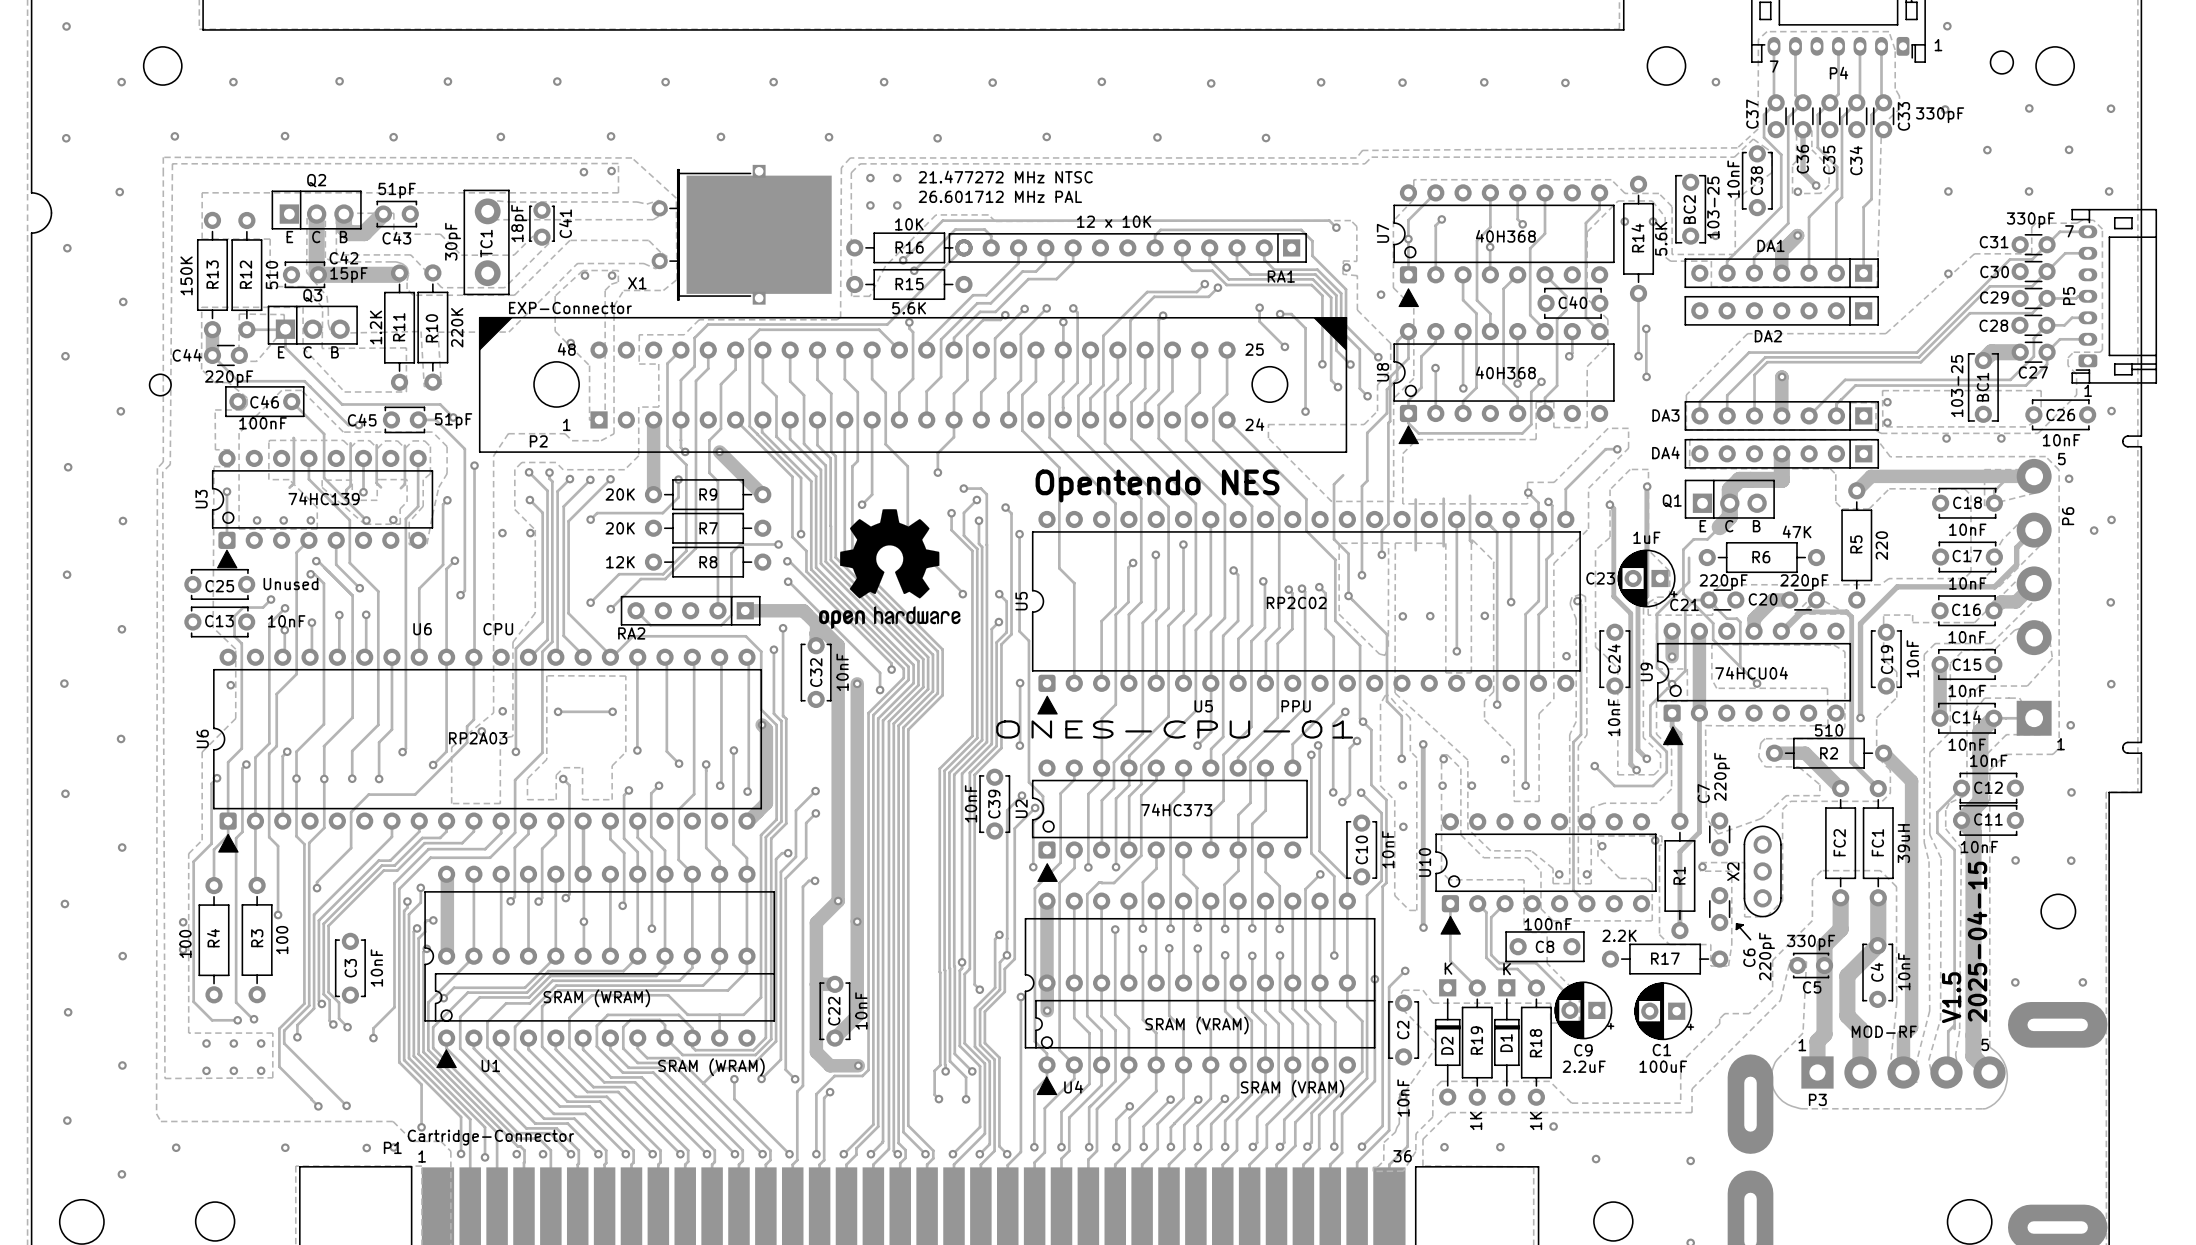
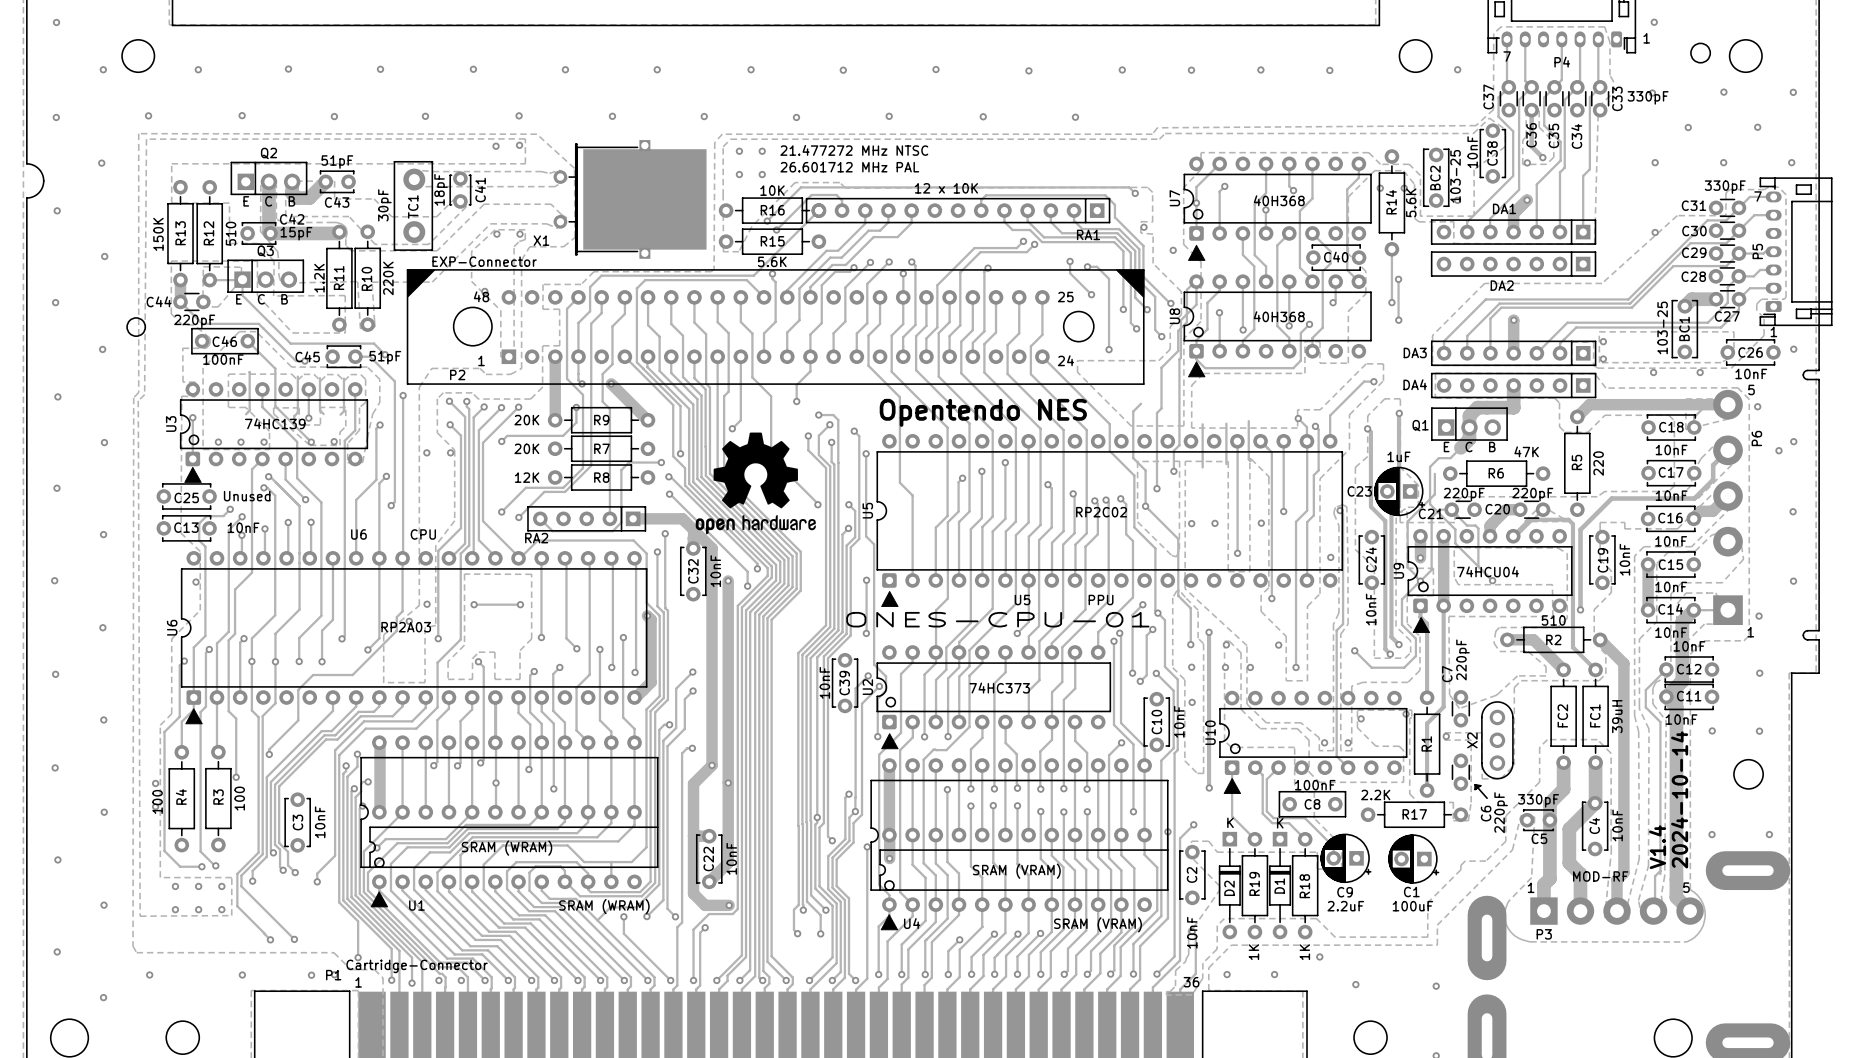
text: 2025-04-15 (1977, 942) -> 2024-10-14 (1679, 799)
text: V1.5 (1951, 997) -> V1.4 (1657, 847)

